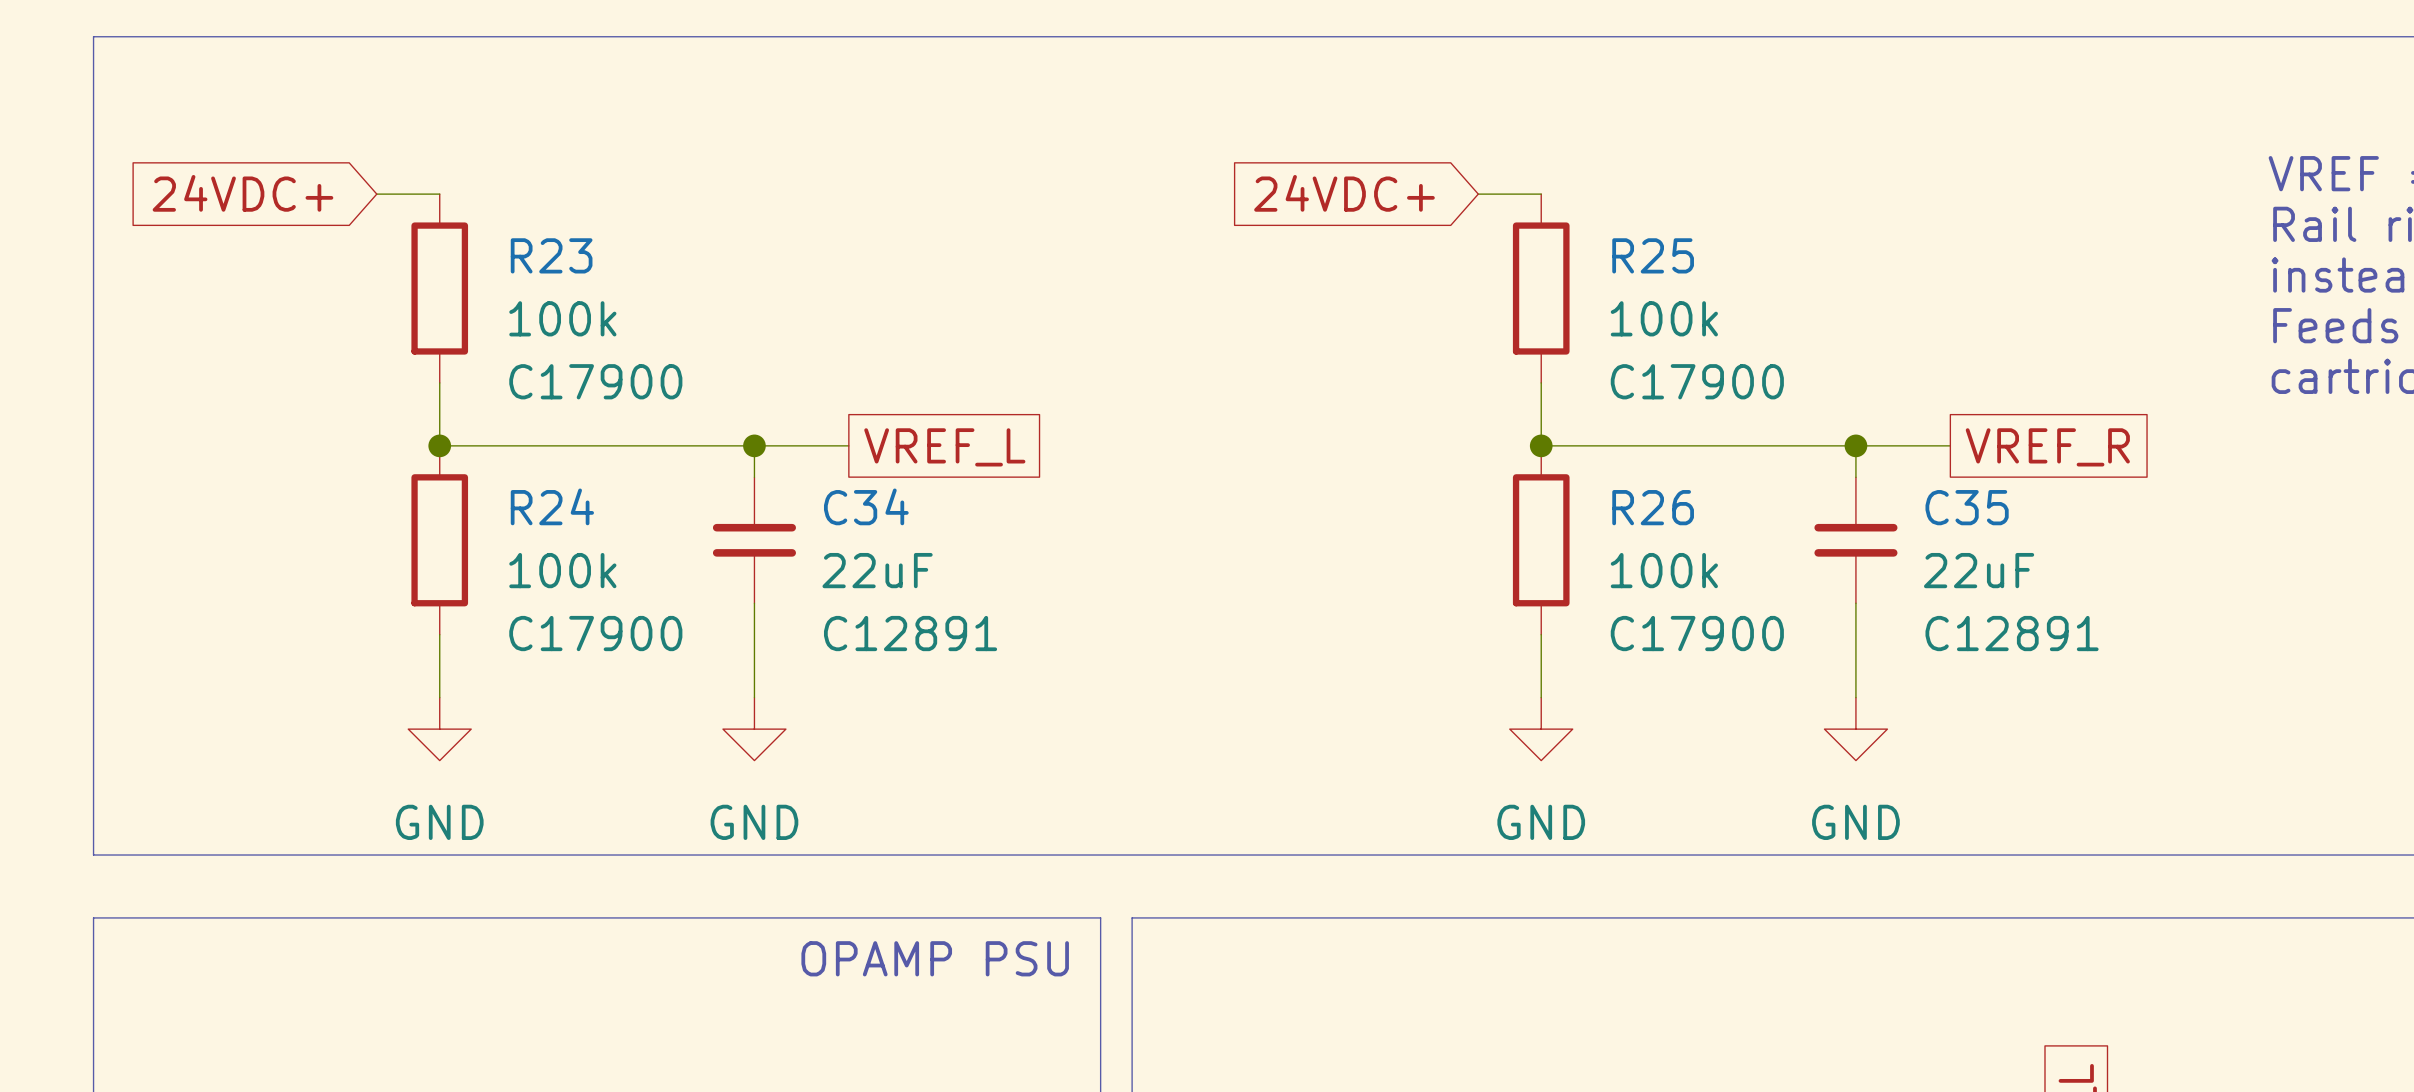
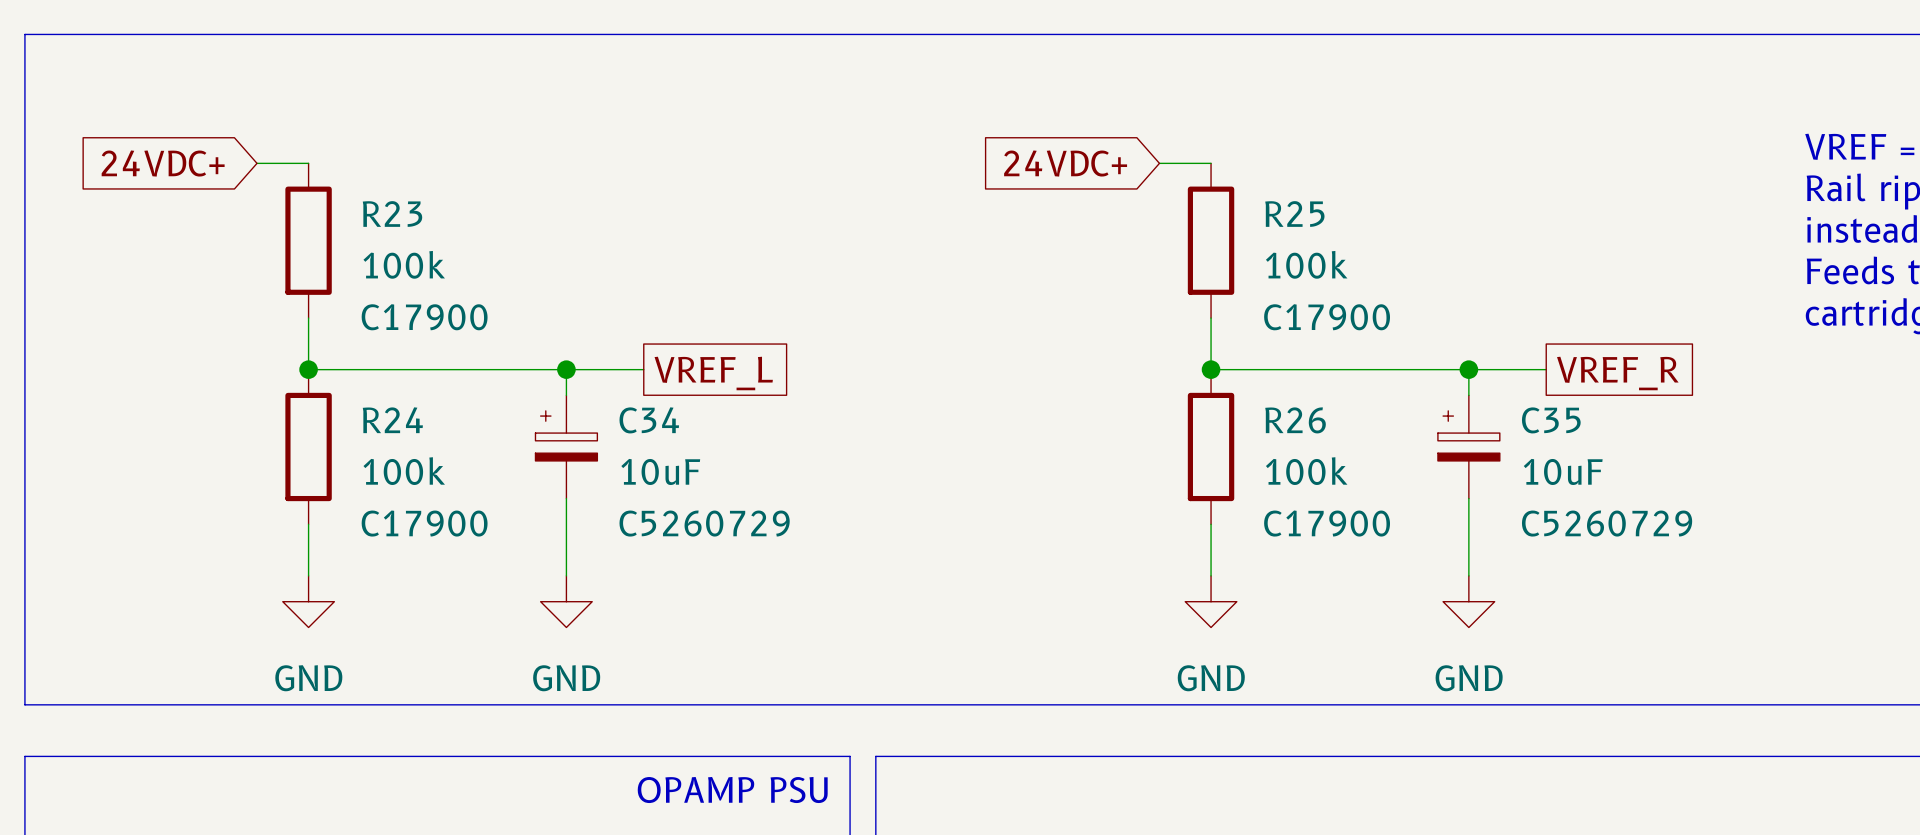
C34 symbol: [712, 477, 796, 604] -> [535, 395, 598, 499]
C35 symbol: [1814, 477, 1898, 604] -> [1437, 395, 1500, 499]
C34 value: 22uF (877, 570) -> 10uF (660, 471)
C35 value: 22uF (1979, 570) -> 10uF (1563, 471)
C34 text: C12891 (910, 633) -> C5260729 (704, 523)
C35 text: C12891 (2012, 633) -> C5260729 (1607, 523)

